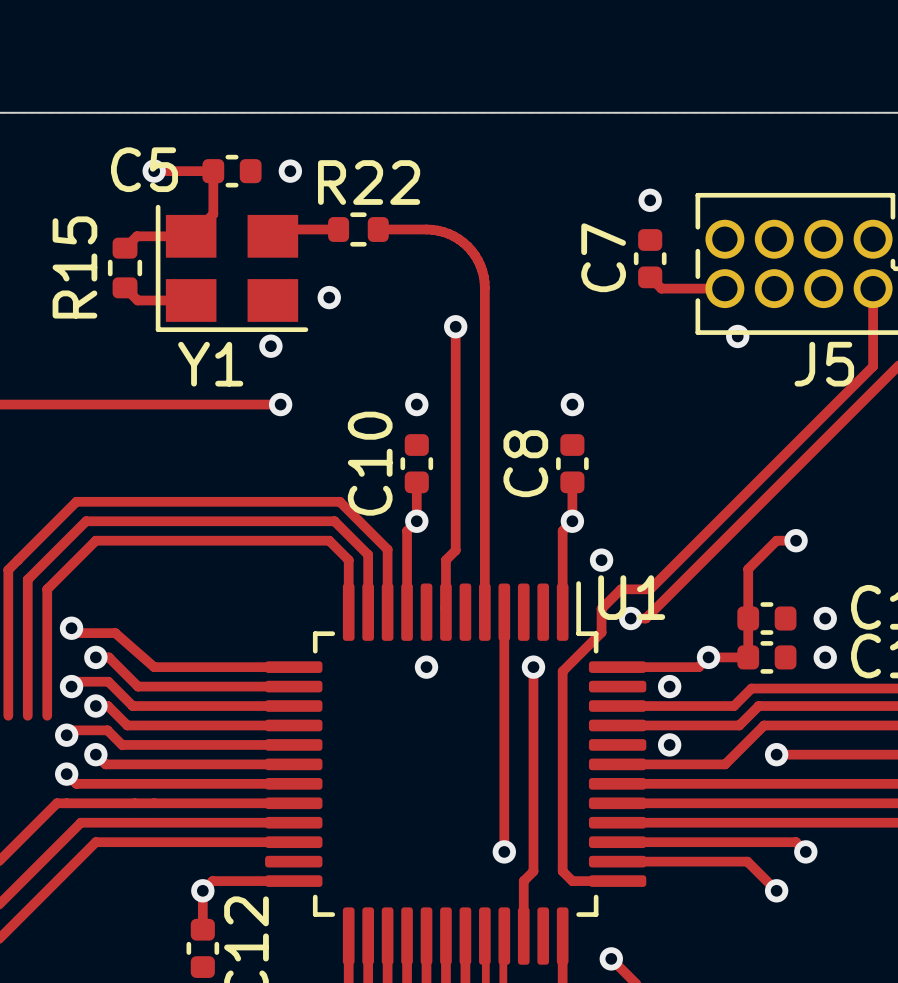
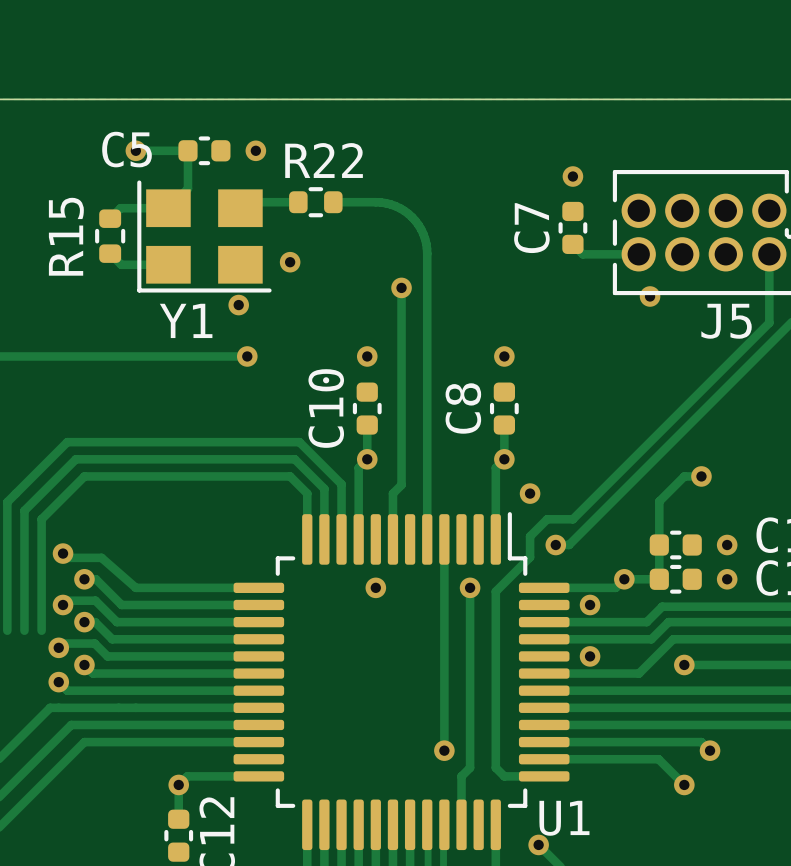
U1 name position: U1 (631, 597) -> U1 (564, 818)

